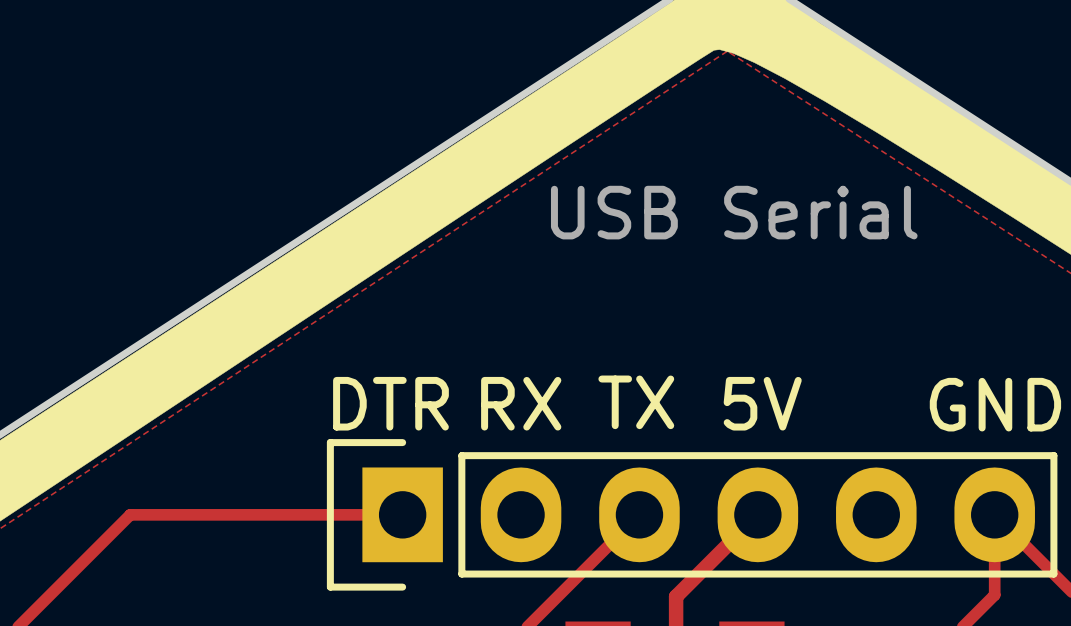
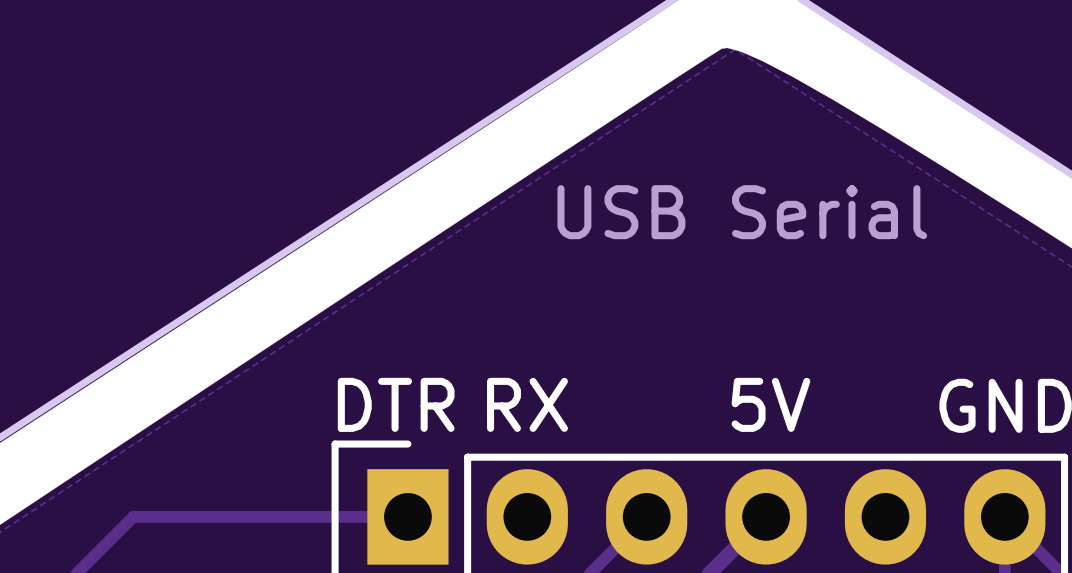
text: TX (636, 402) -> none

